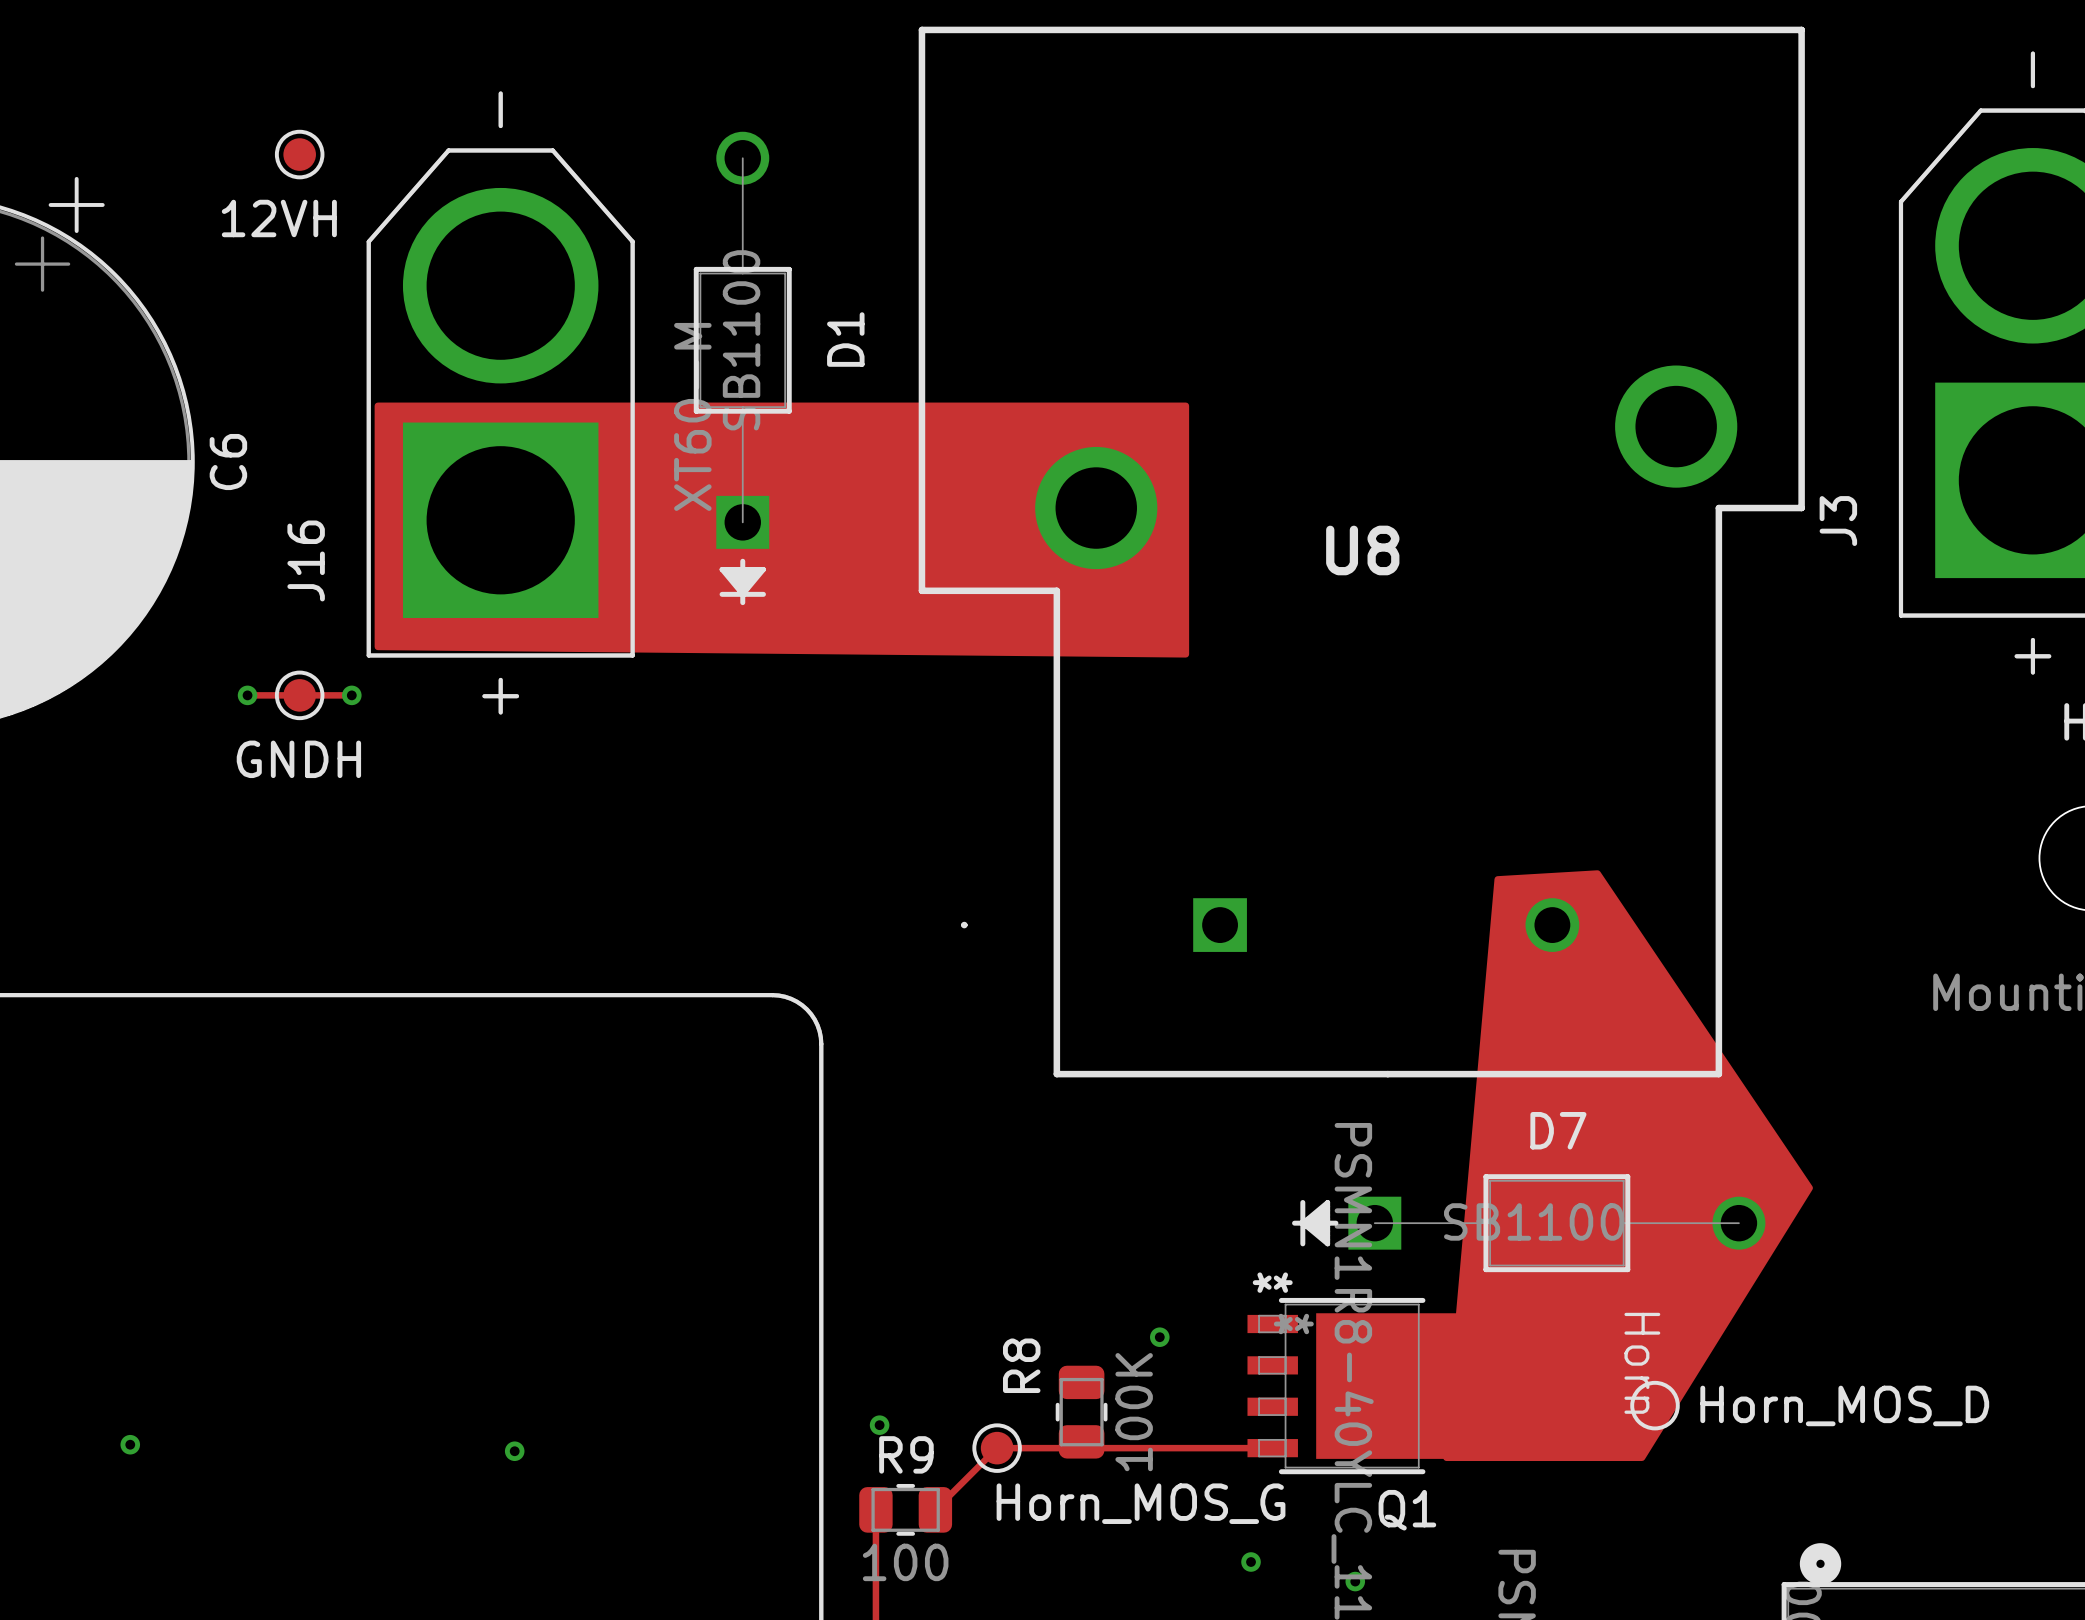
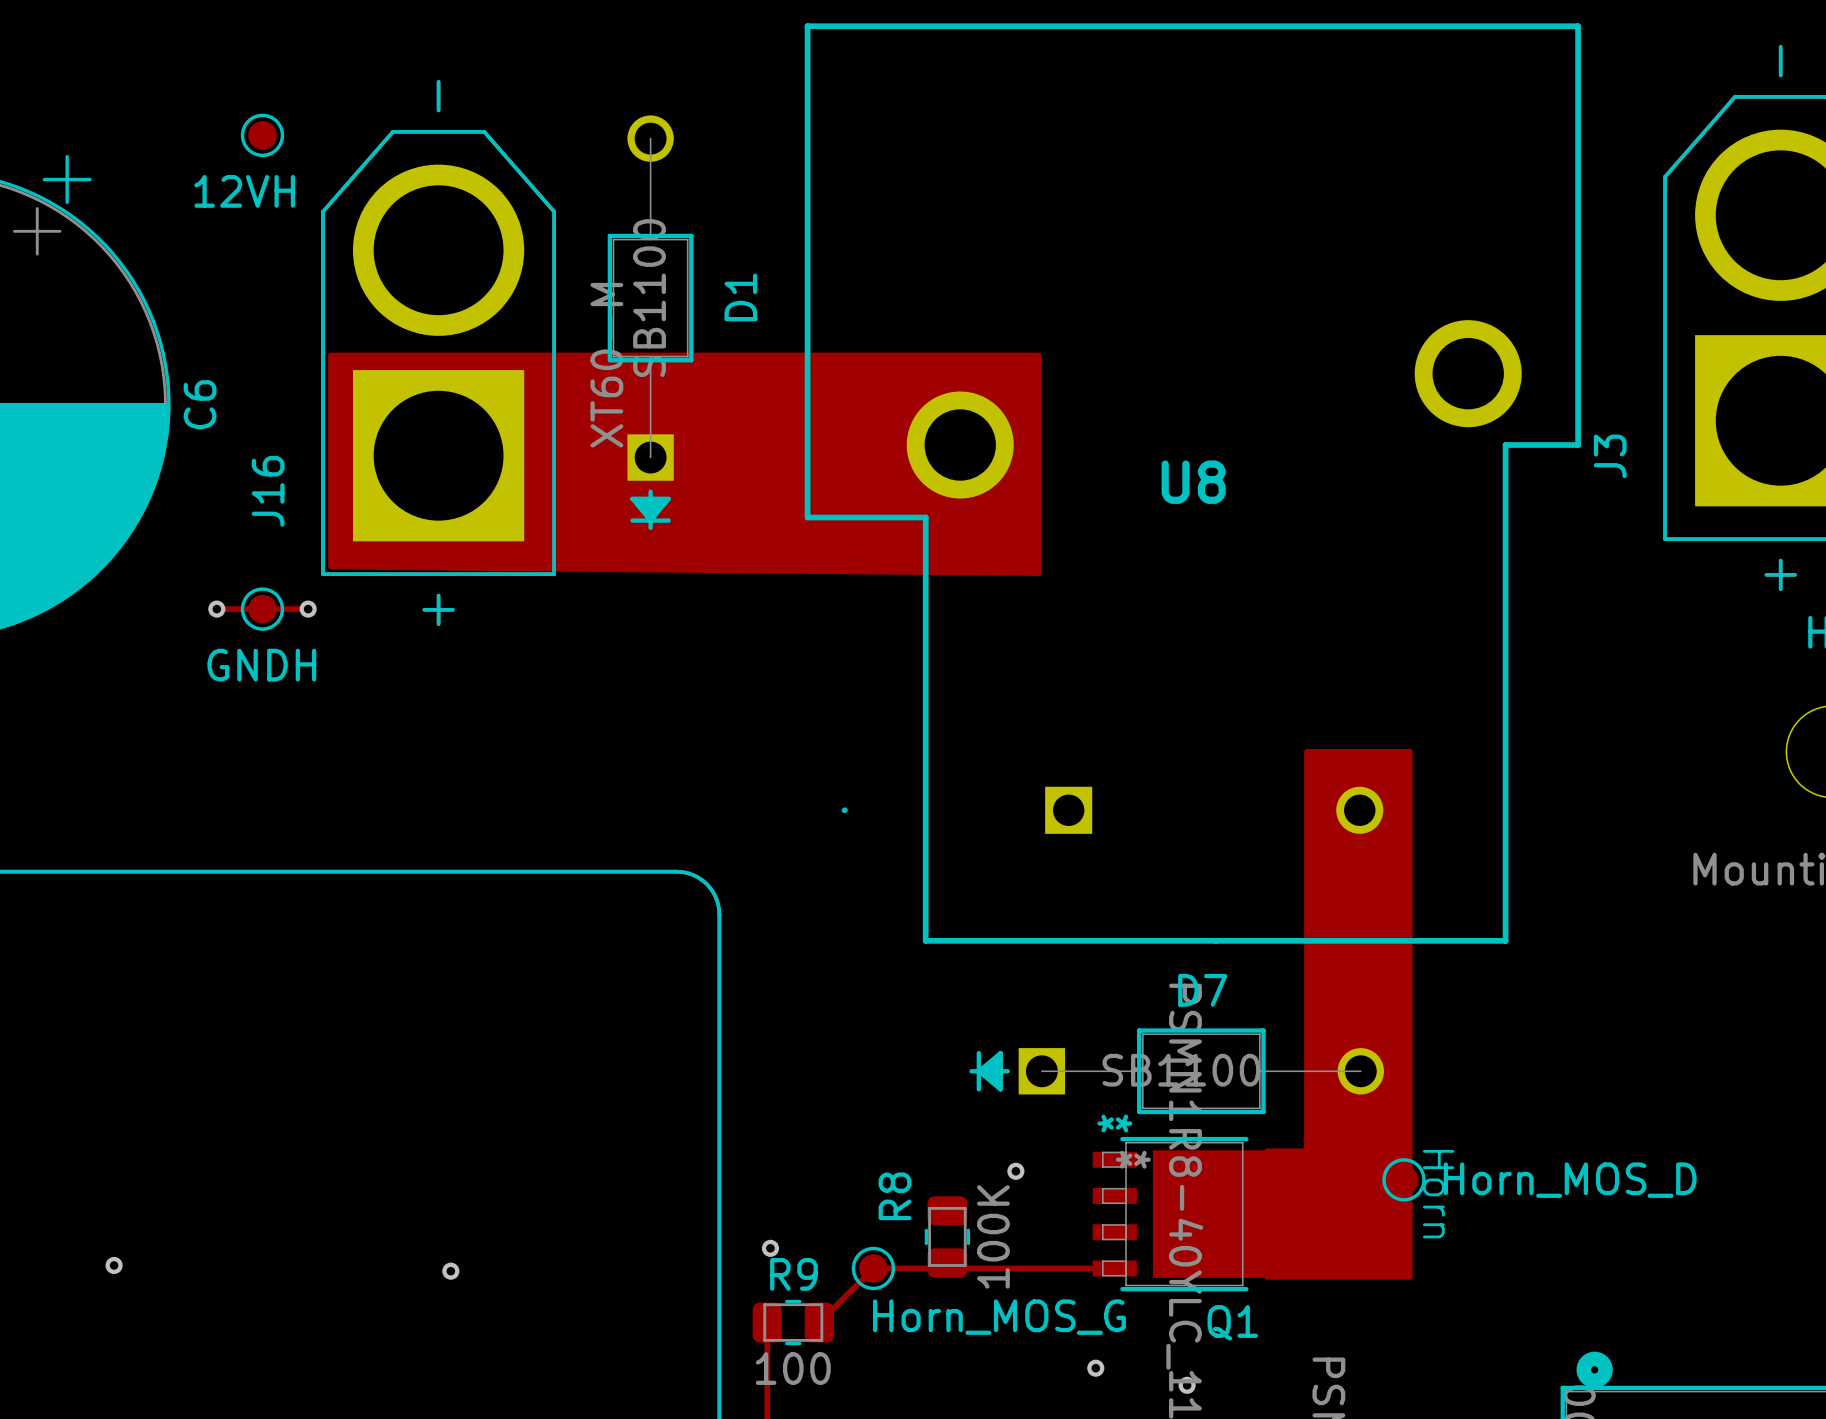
drawing: none -> [1264, 748, 1413, 1280]
drawing: [1443, 870, 1813, 1462] -> none
D7 position: (1528, 1223) -> (1176, 1071)
part position: (1655, 1405) -> (1404, 1179)

